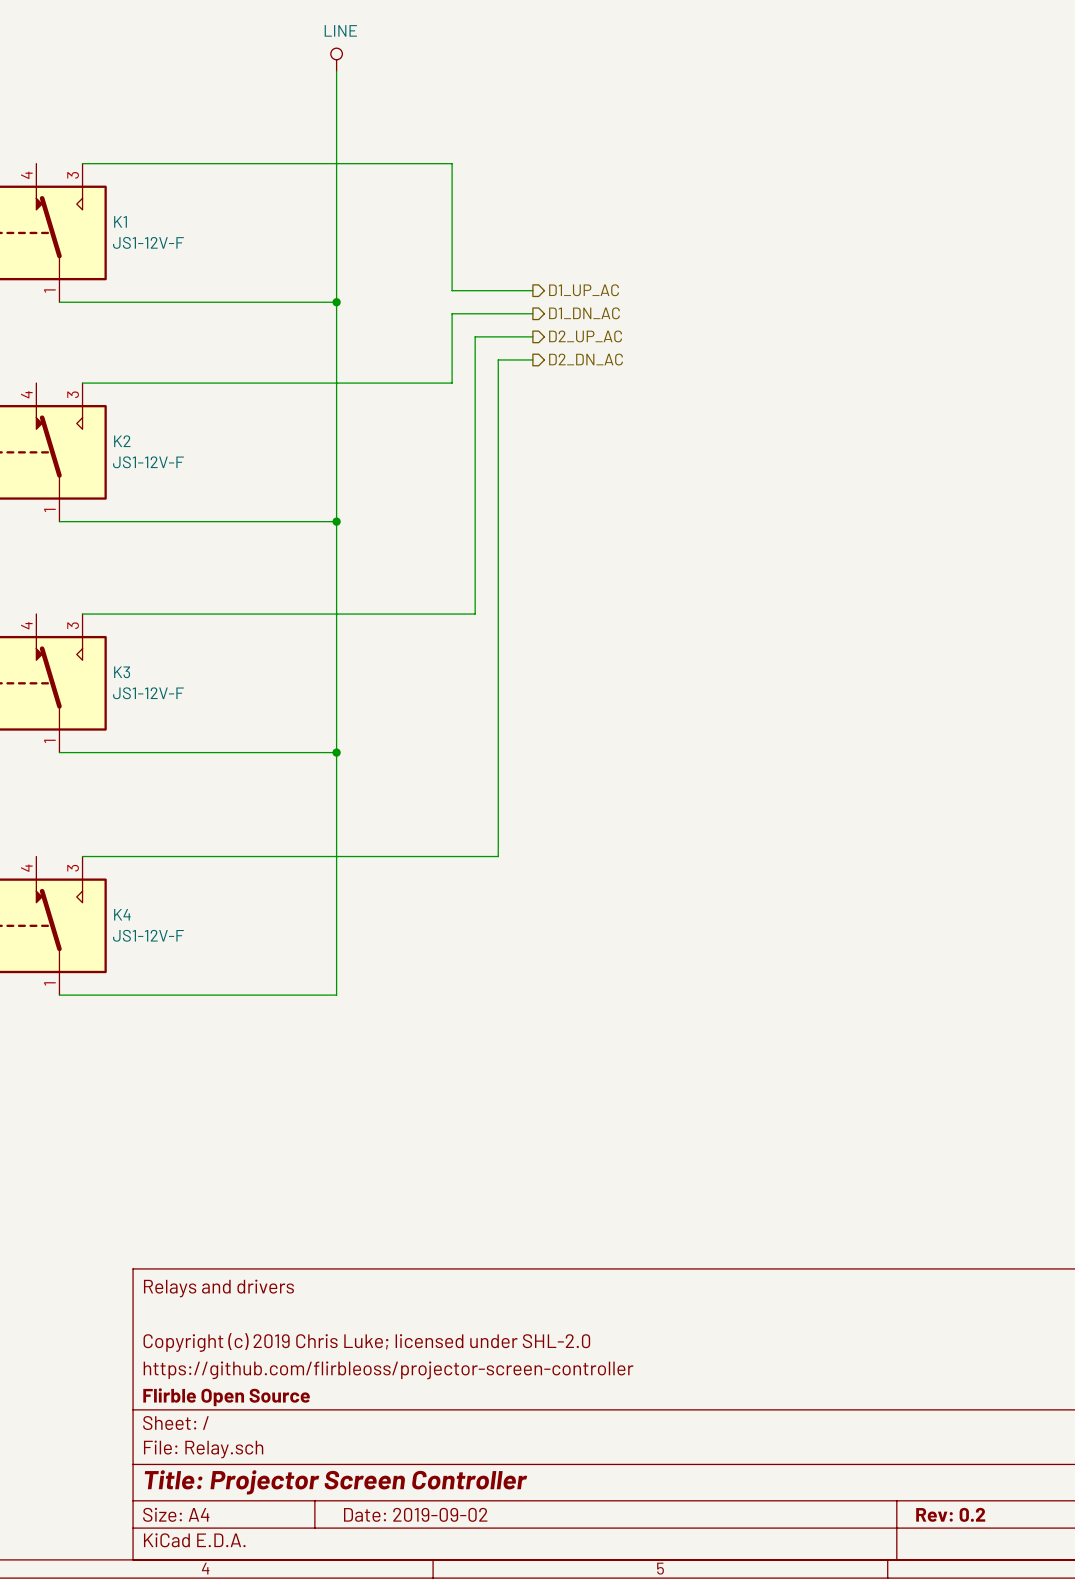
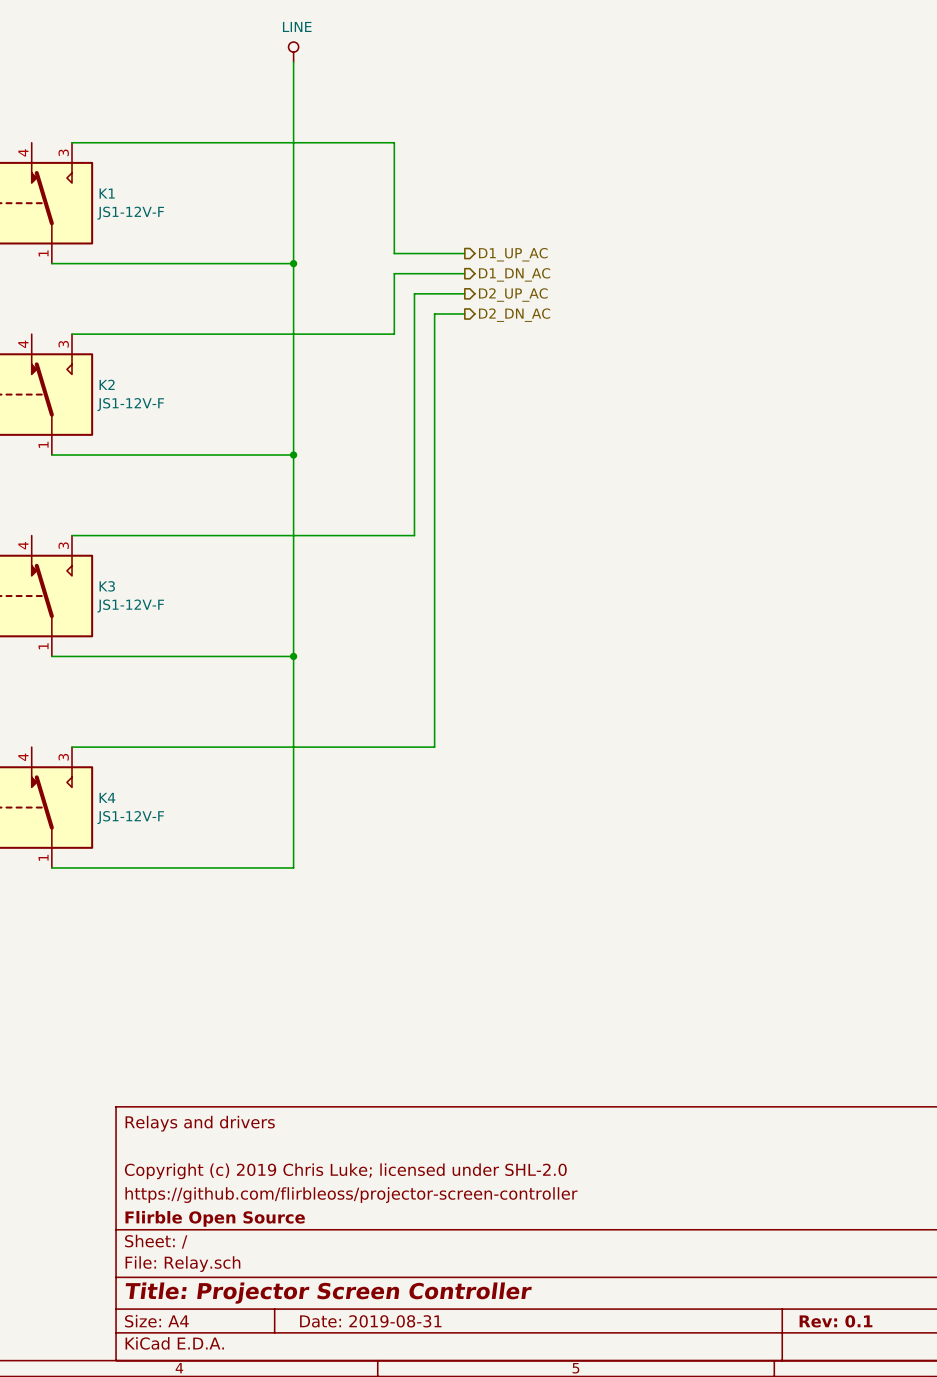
title block: Date: 2019-09-02 (415, 1514) -> Date: 2019-08-31 (370, 1321)
title block: Rev: 0.2 (950, 1514) -> Rev: 0.1 (835, 1321)

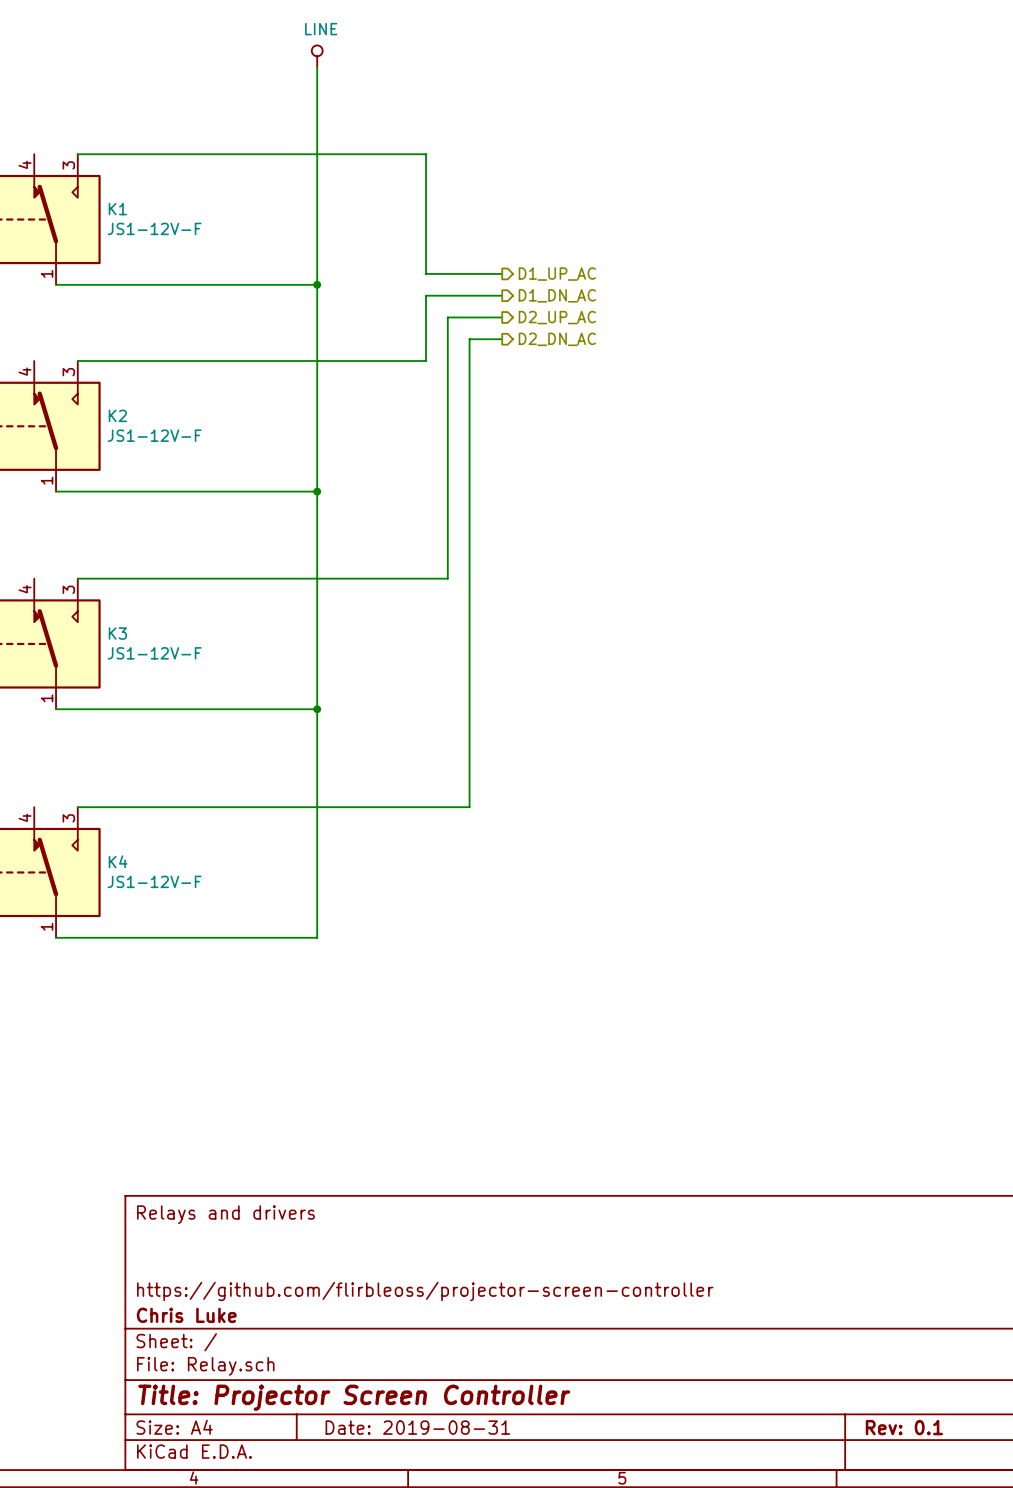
title block: Copyright (c) 2019 Chris Luke; licensed under SHL-2.0 (345, 1171) -> none
title block: Flirble Open Source (215, 1218) -> Chris Luke (186, 1315)

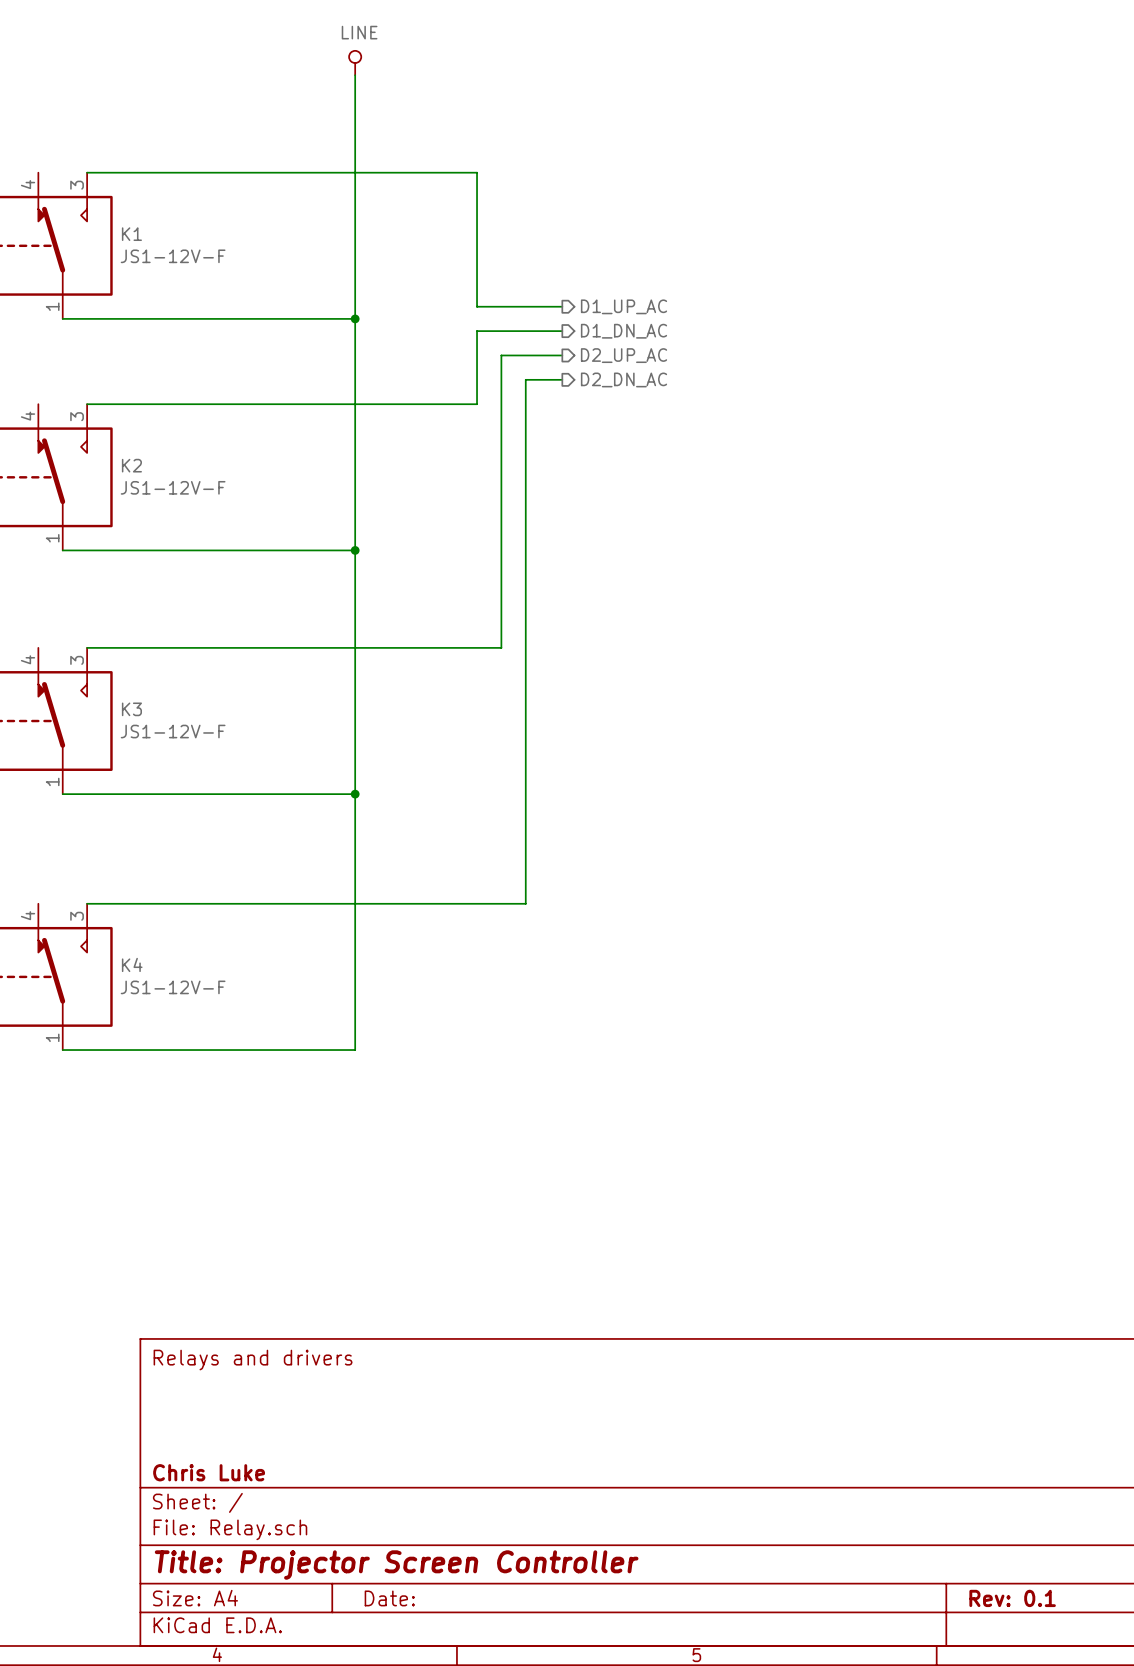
title block: https://github.com/flirbleoss/projector-screen-controller (425, 1291) -> none
title block: Date: 2019-08-31 (417, 1427) -> Date: (389, 1598)

